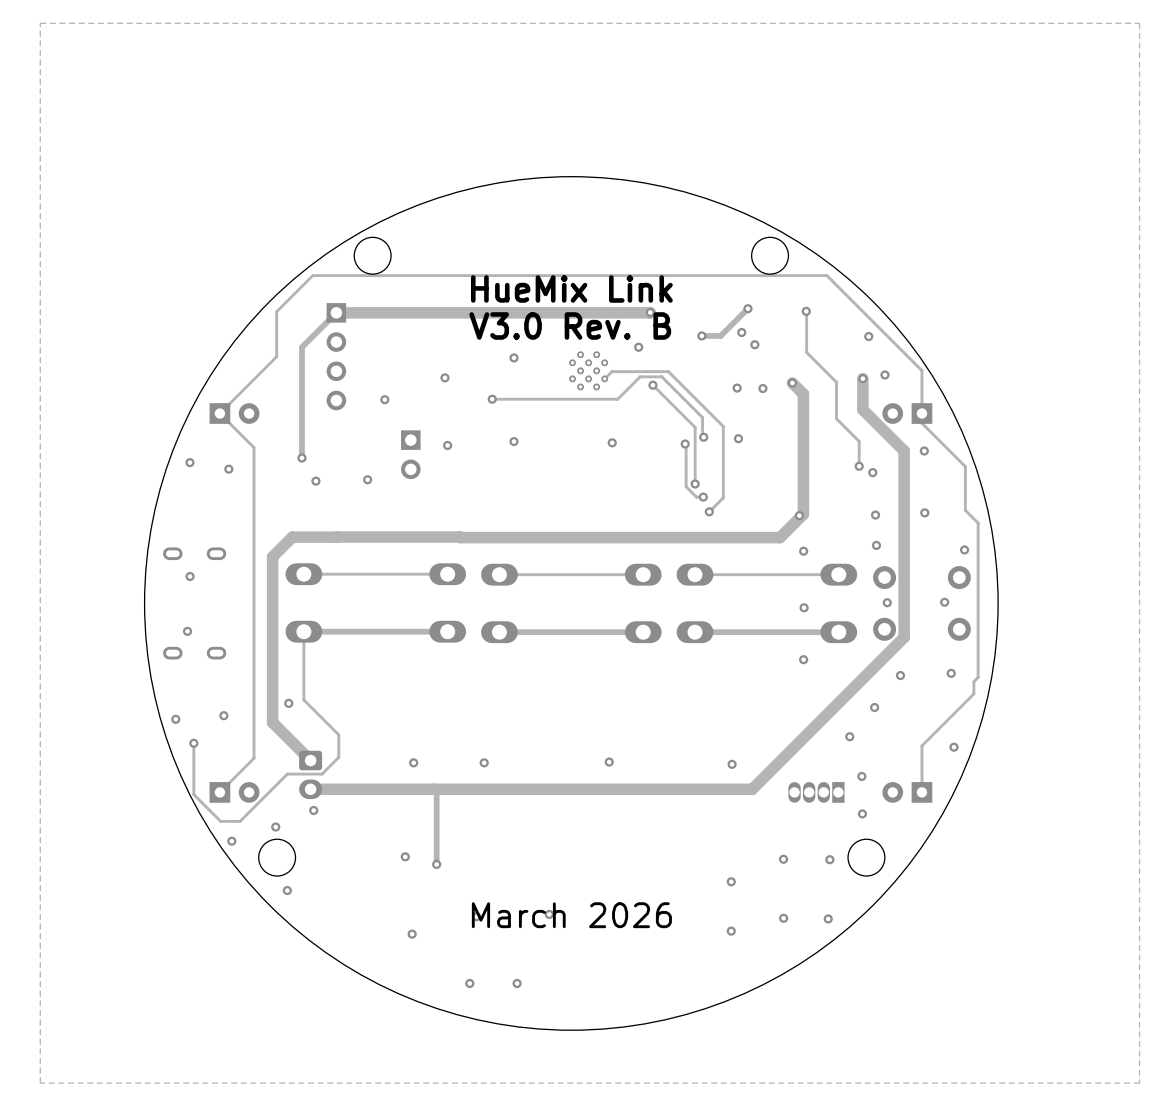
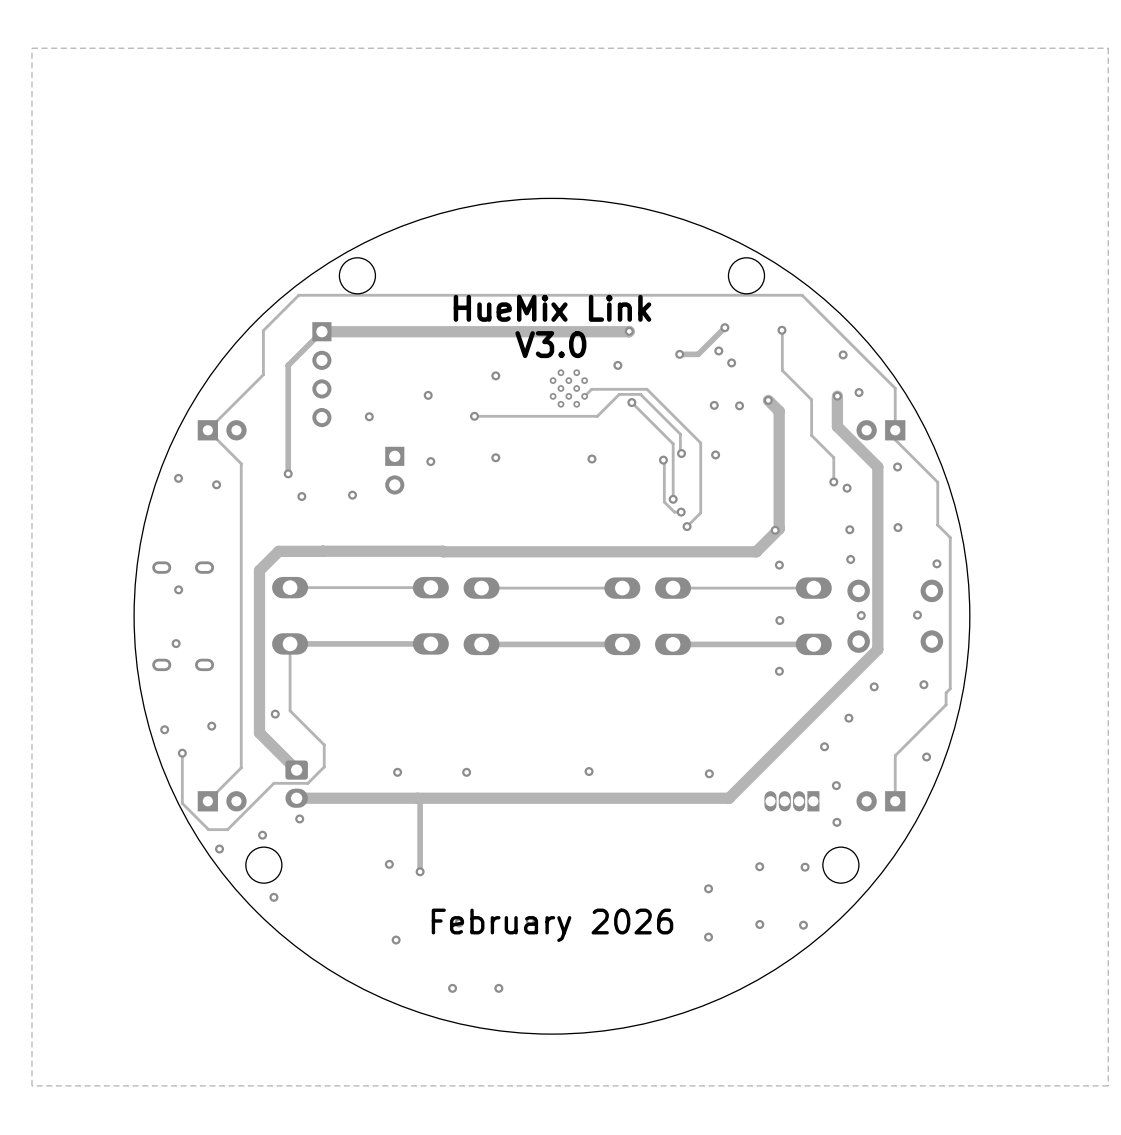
text: V3.0 Rev. B (570, 325) -> V3.0 (550, 344)
text: March 2026 (571, 915) -> February 2026 (552, 925)

